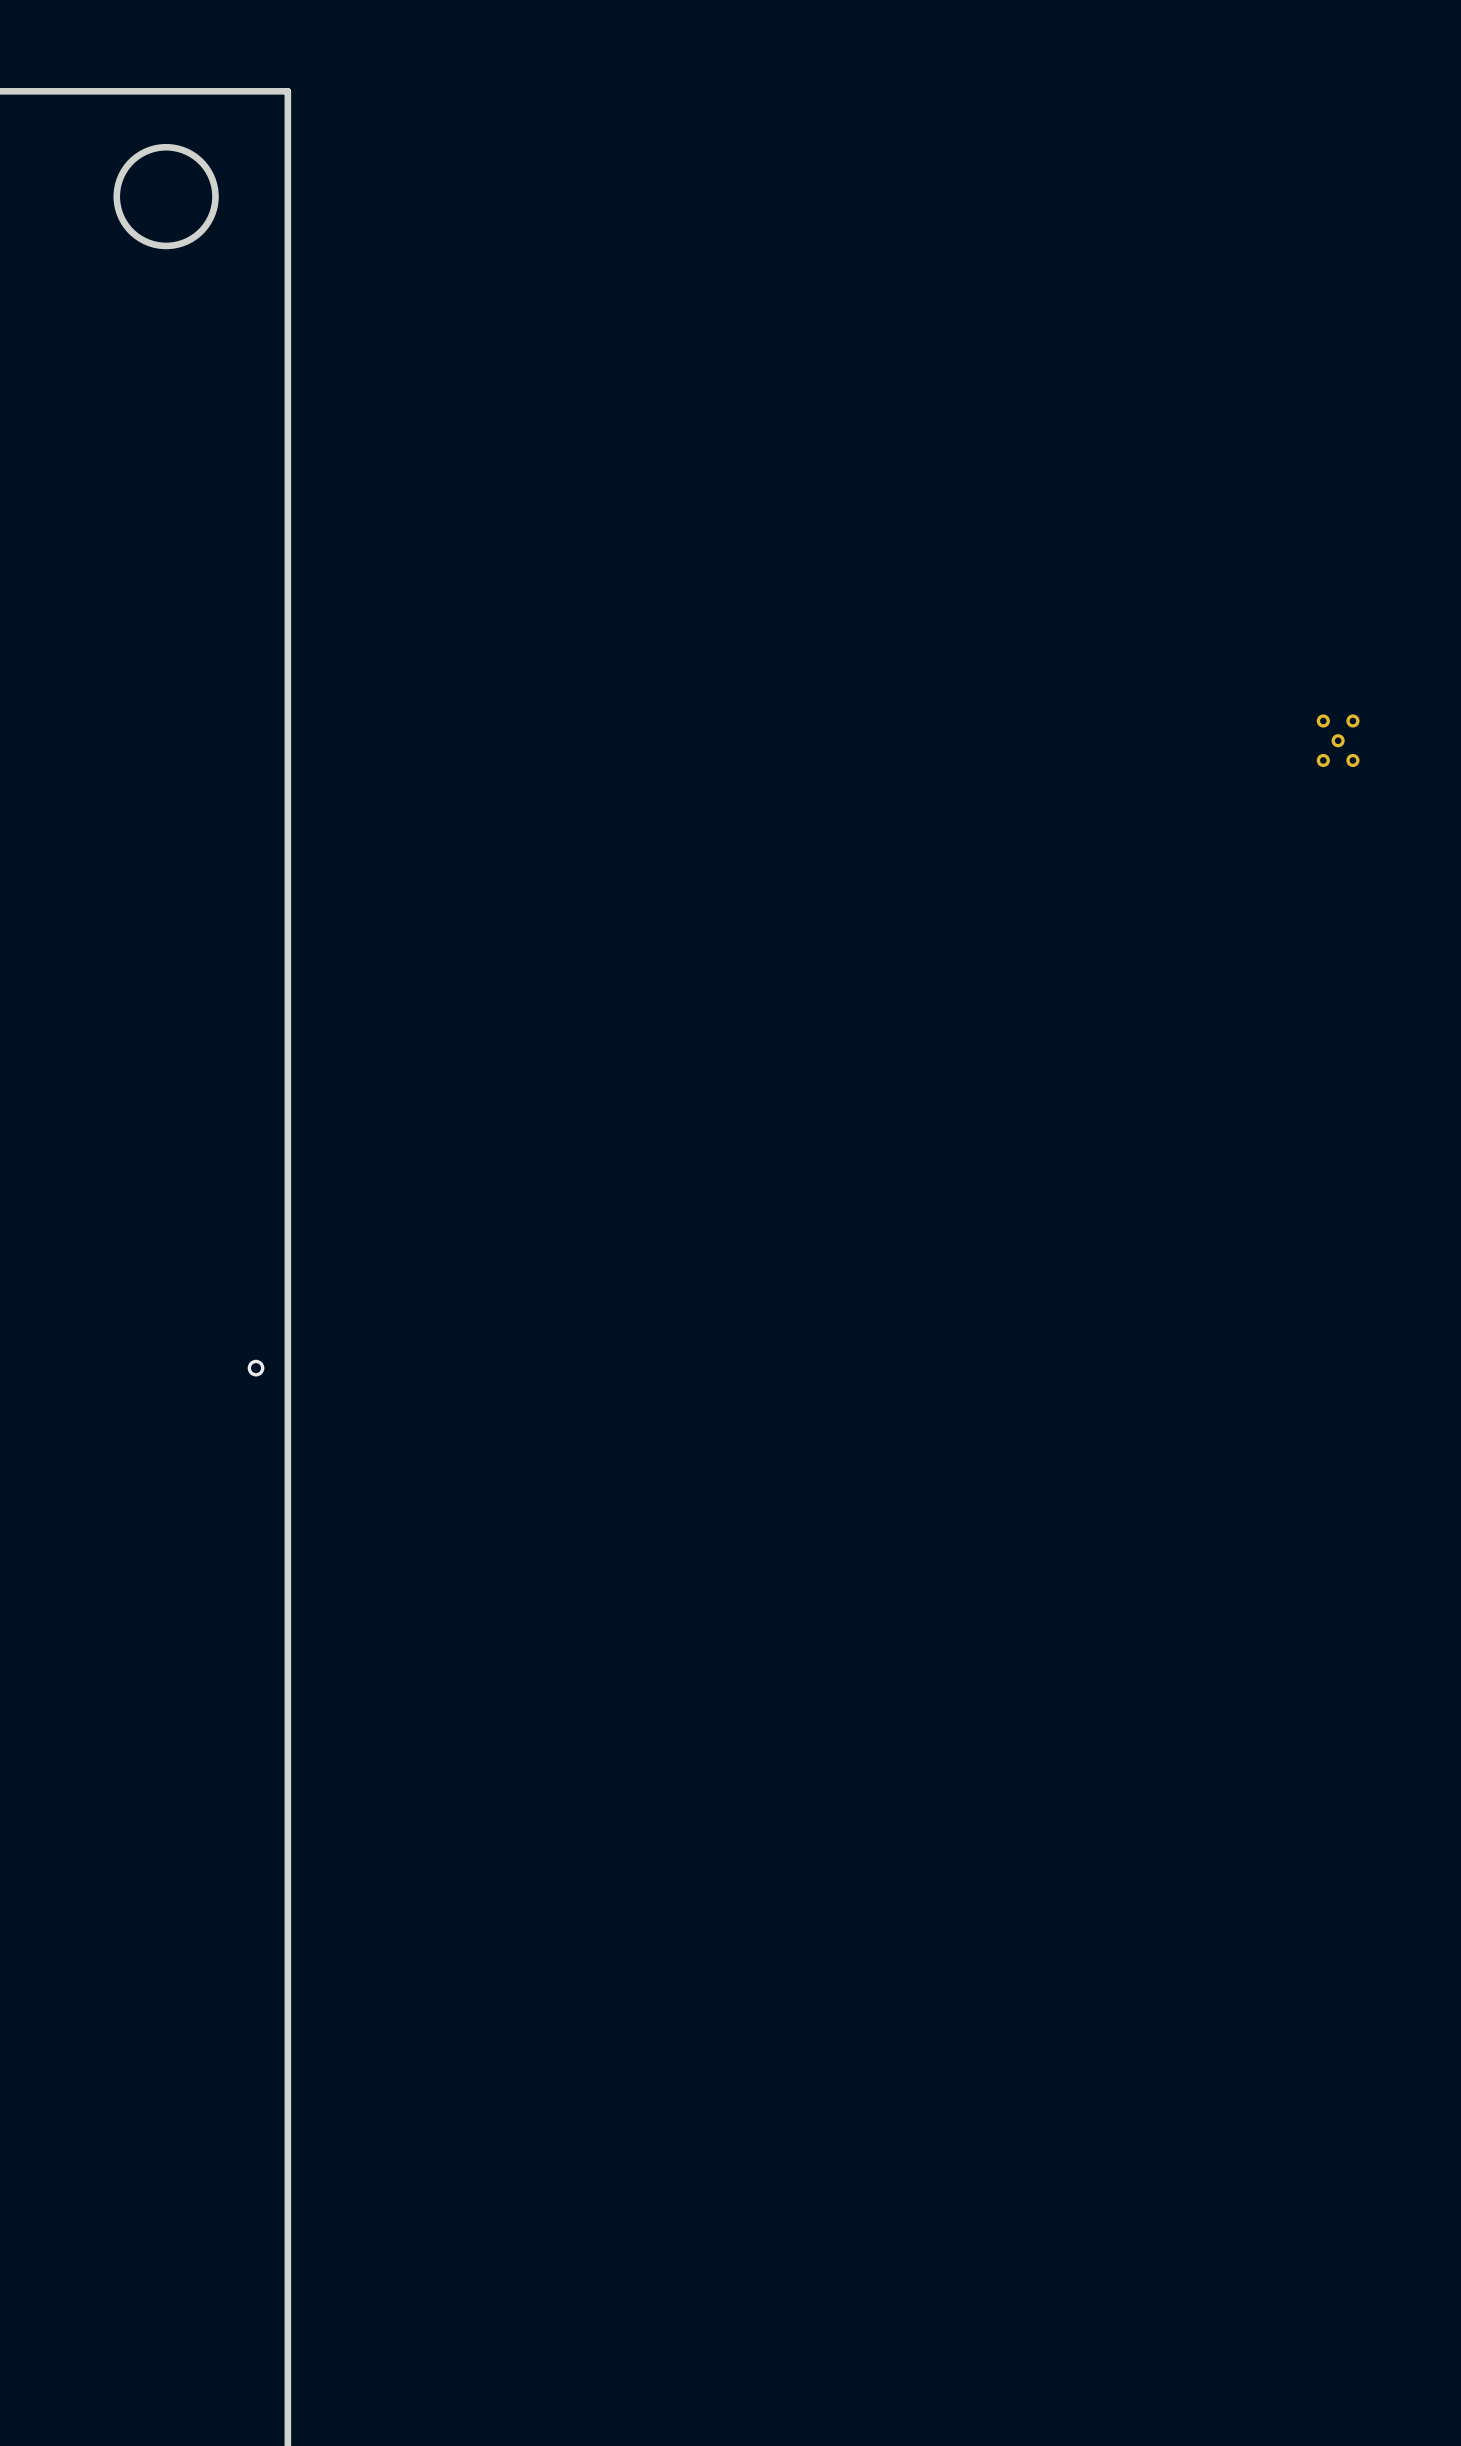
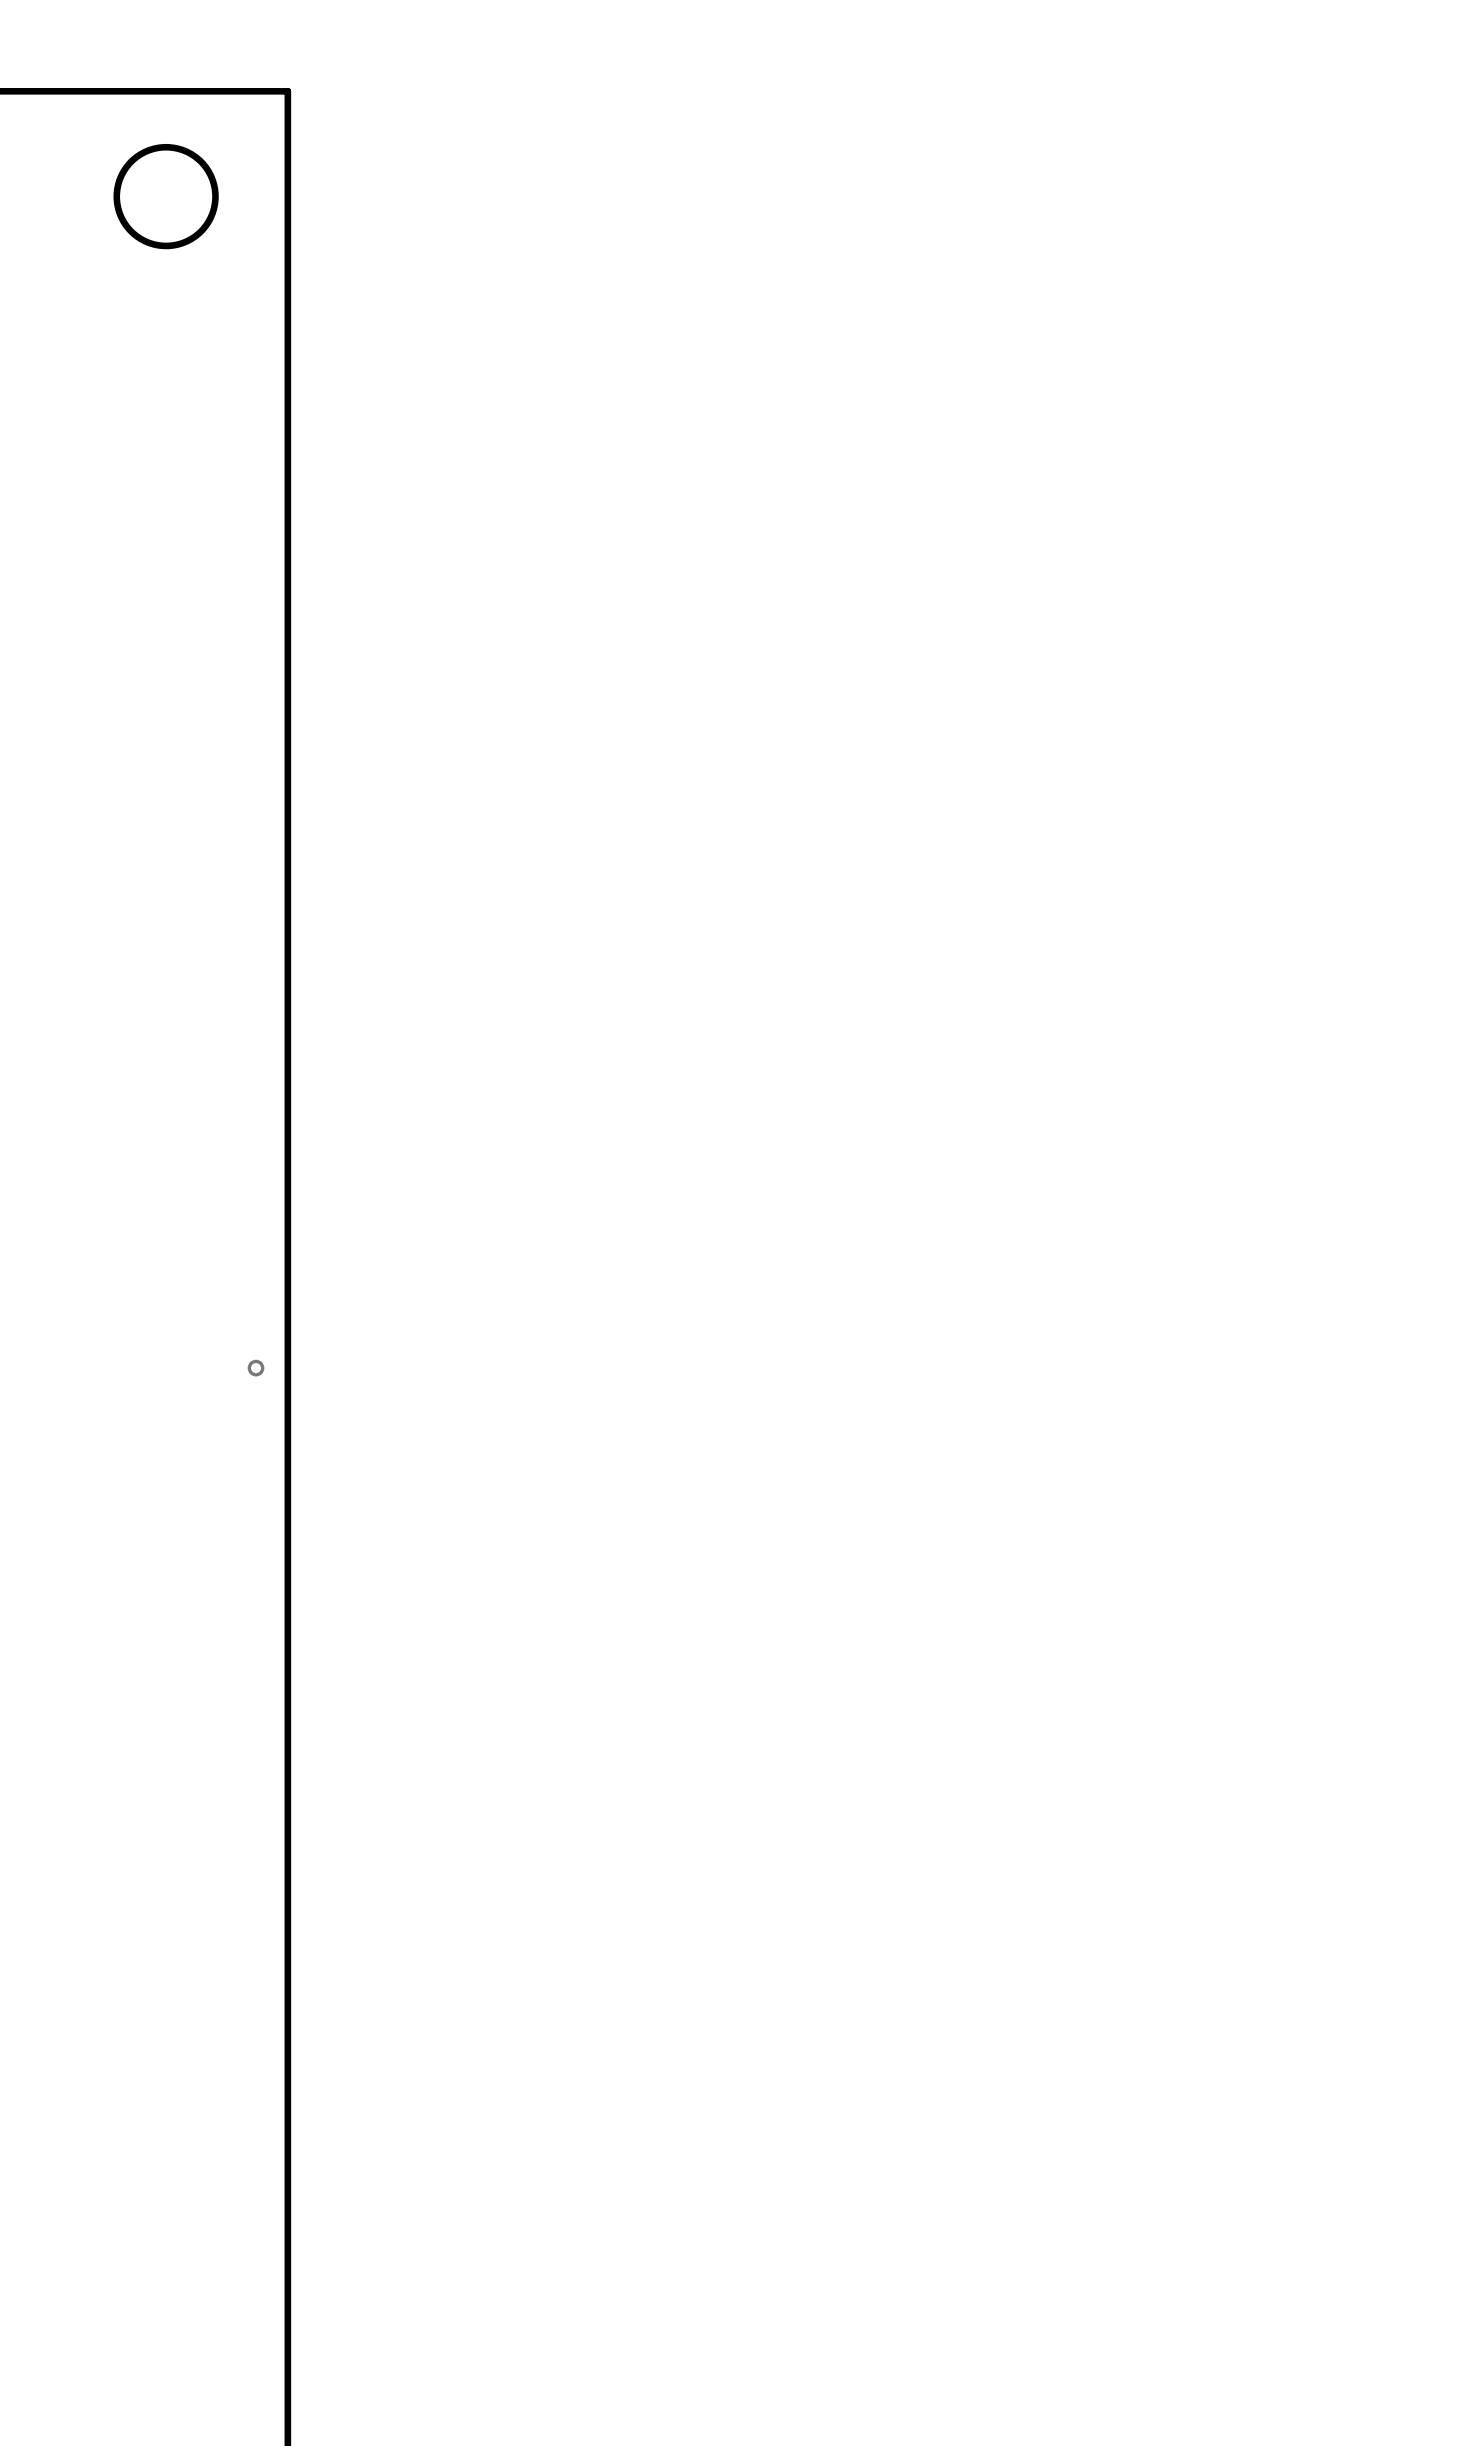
part: (1338, 740) -> none

